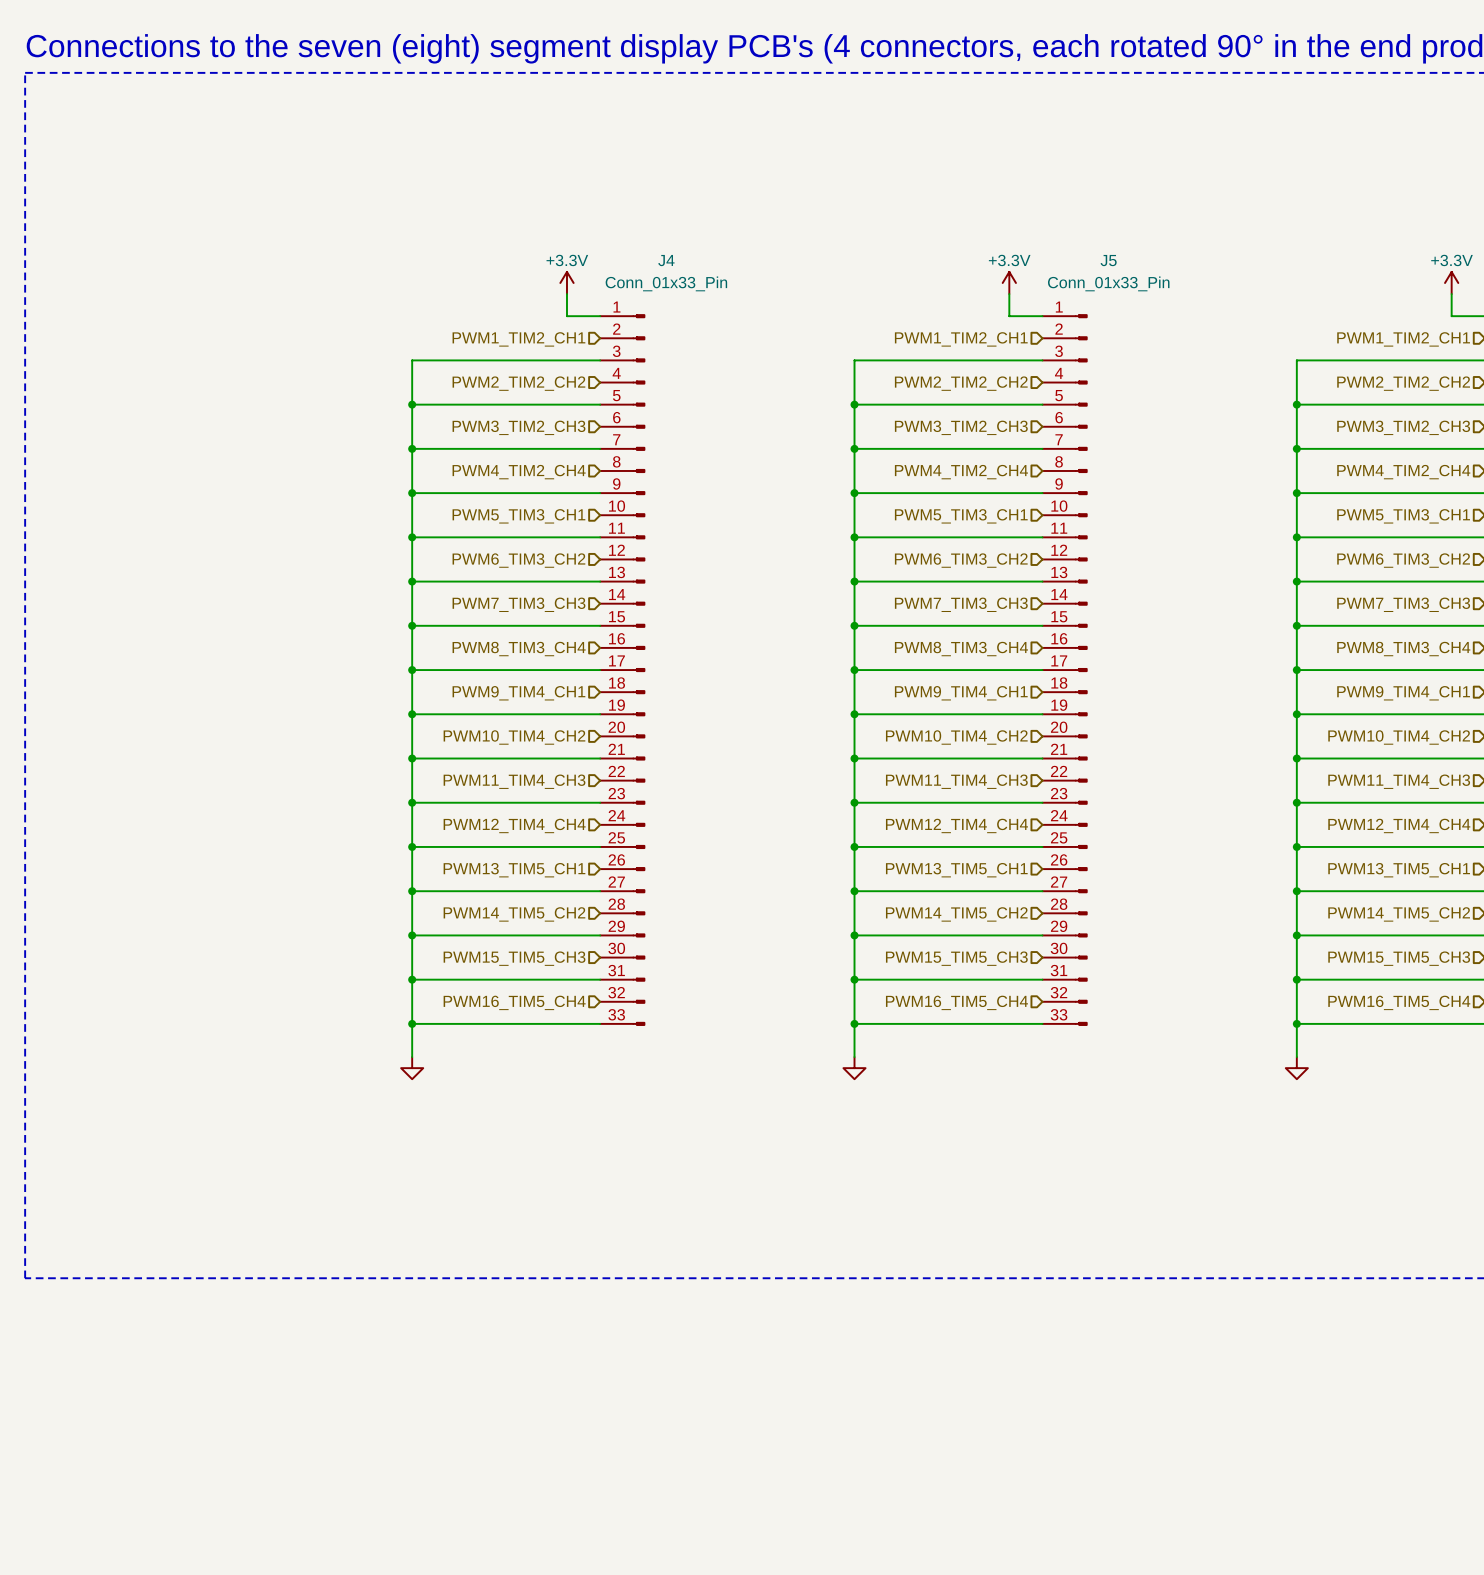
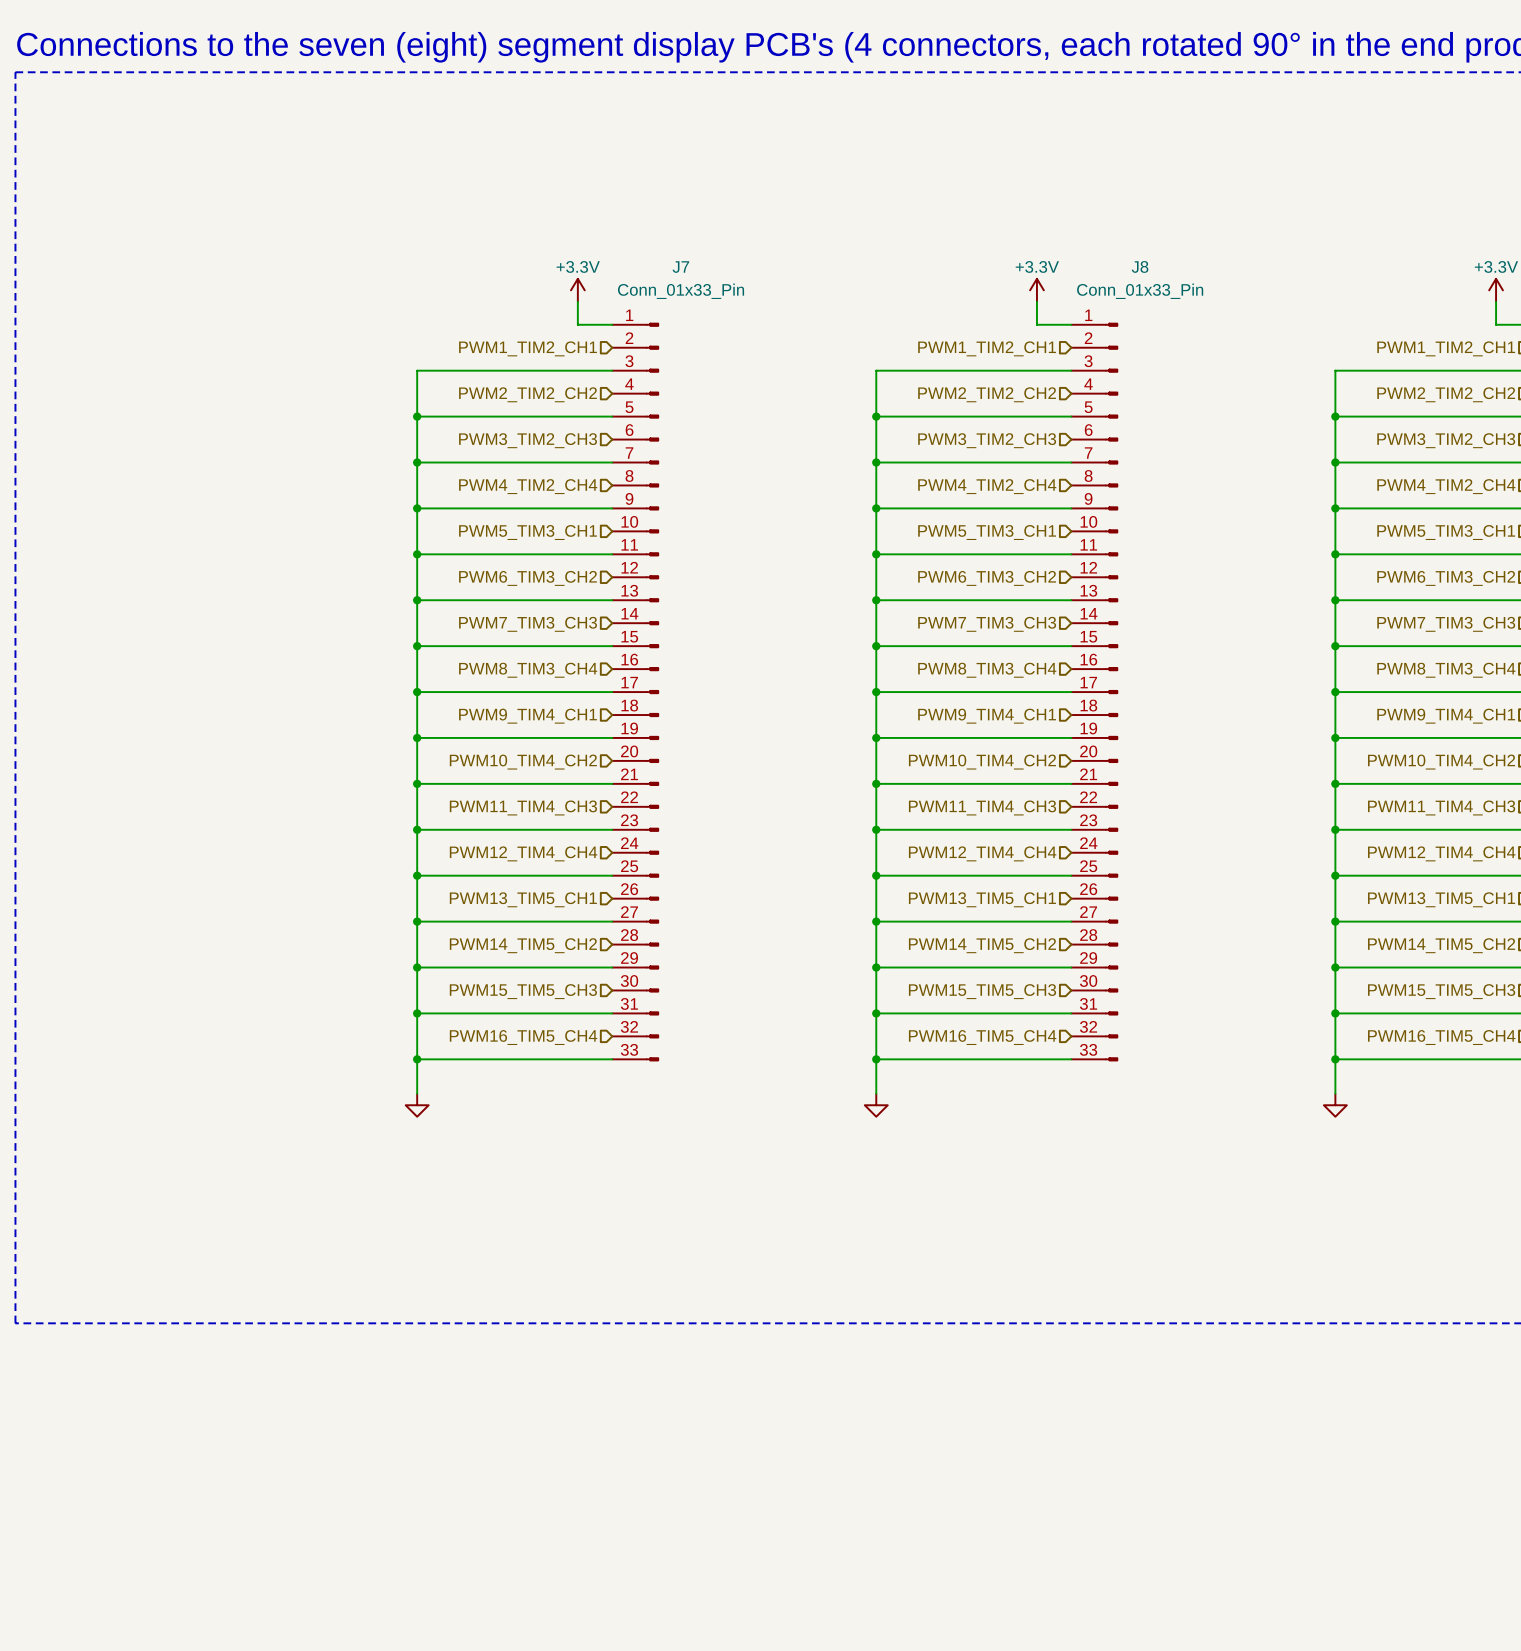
J4 name: J4 (666, 260) -> J7 (680, 267)
J5 name: J5 (1108, 260) -> J8 (1140, 266)

